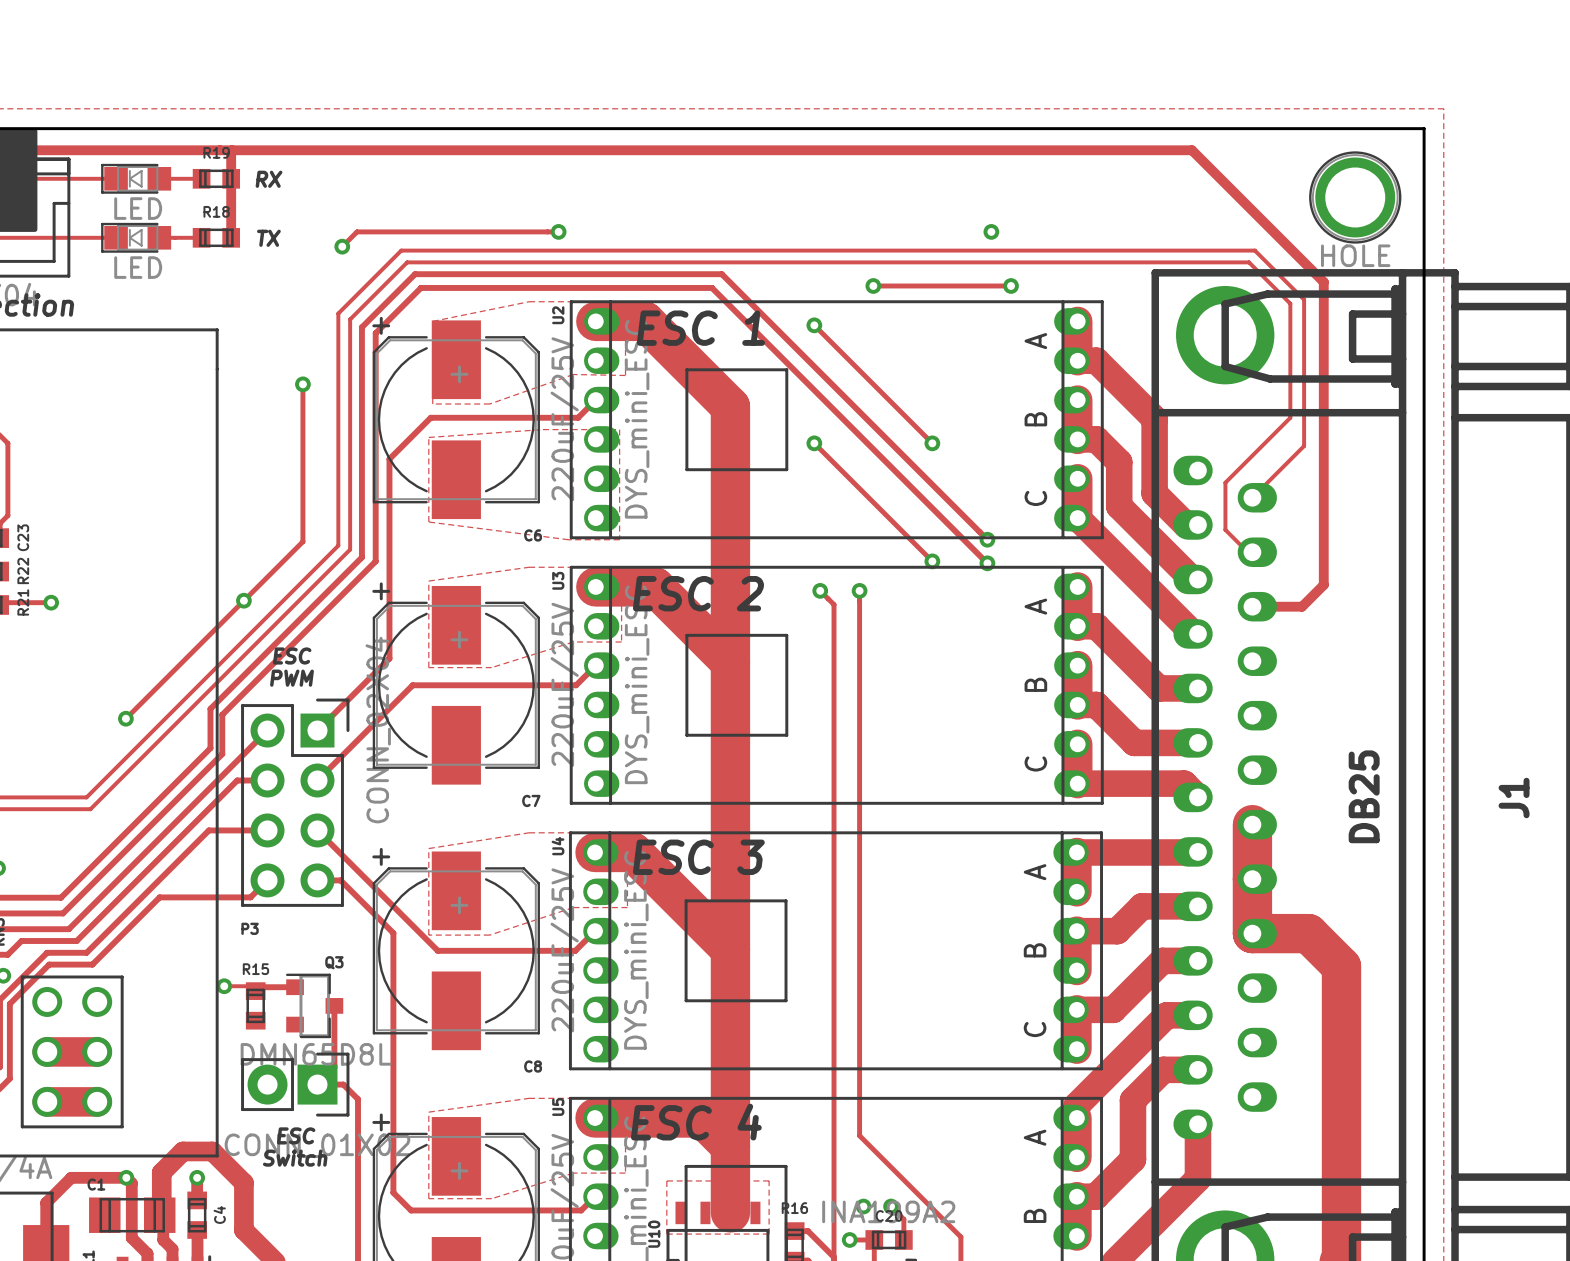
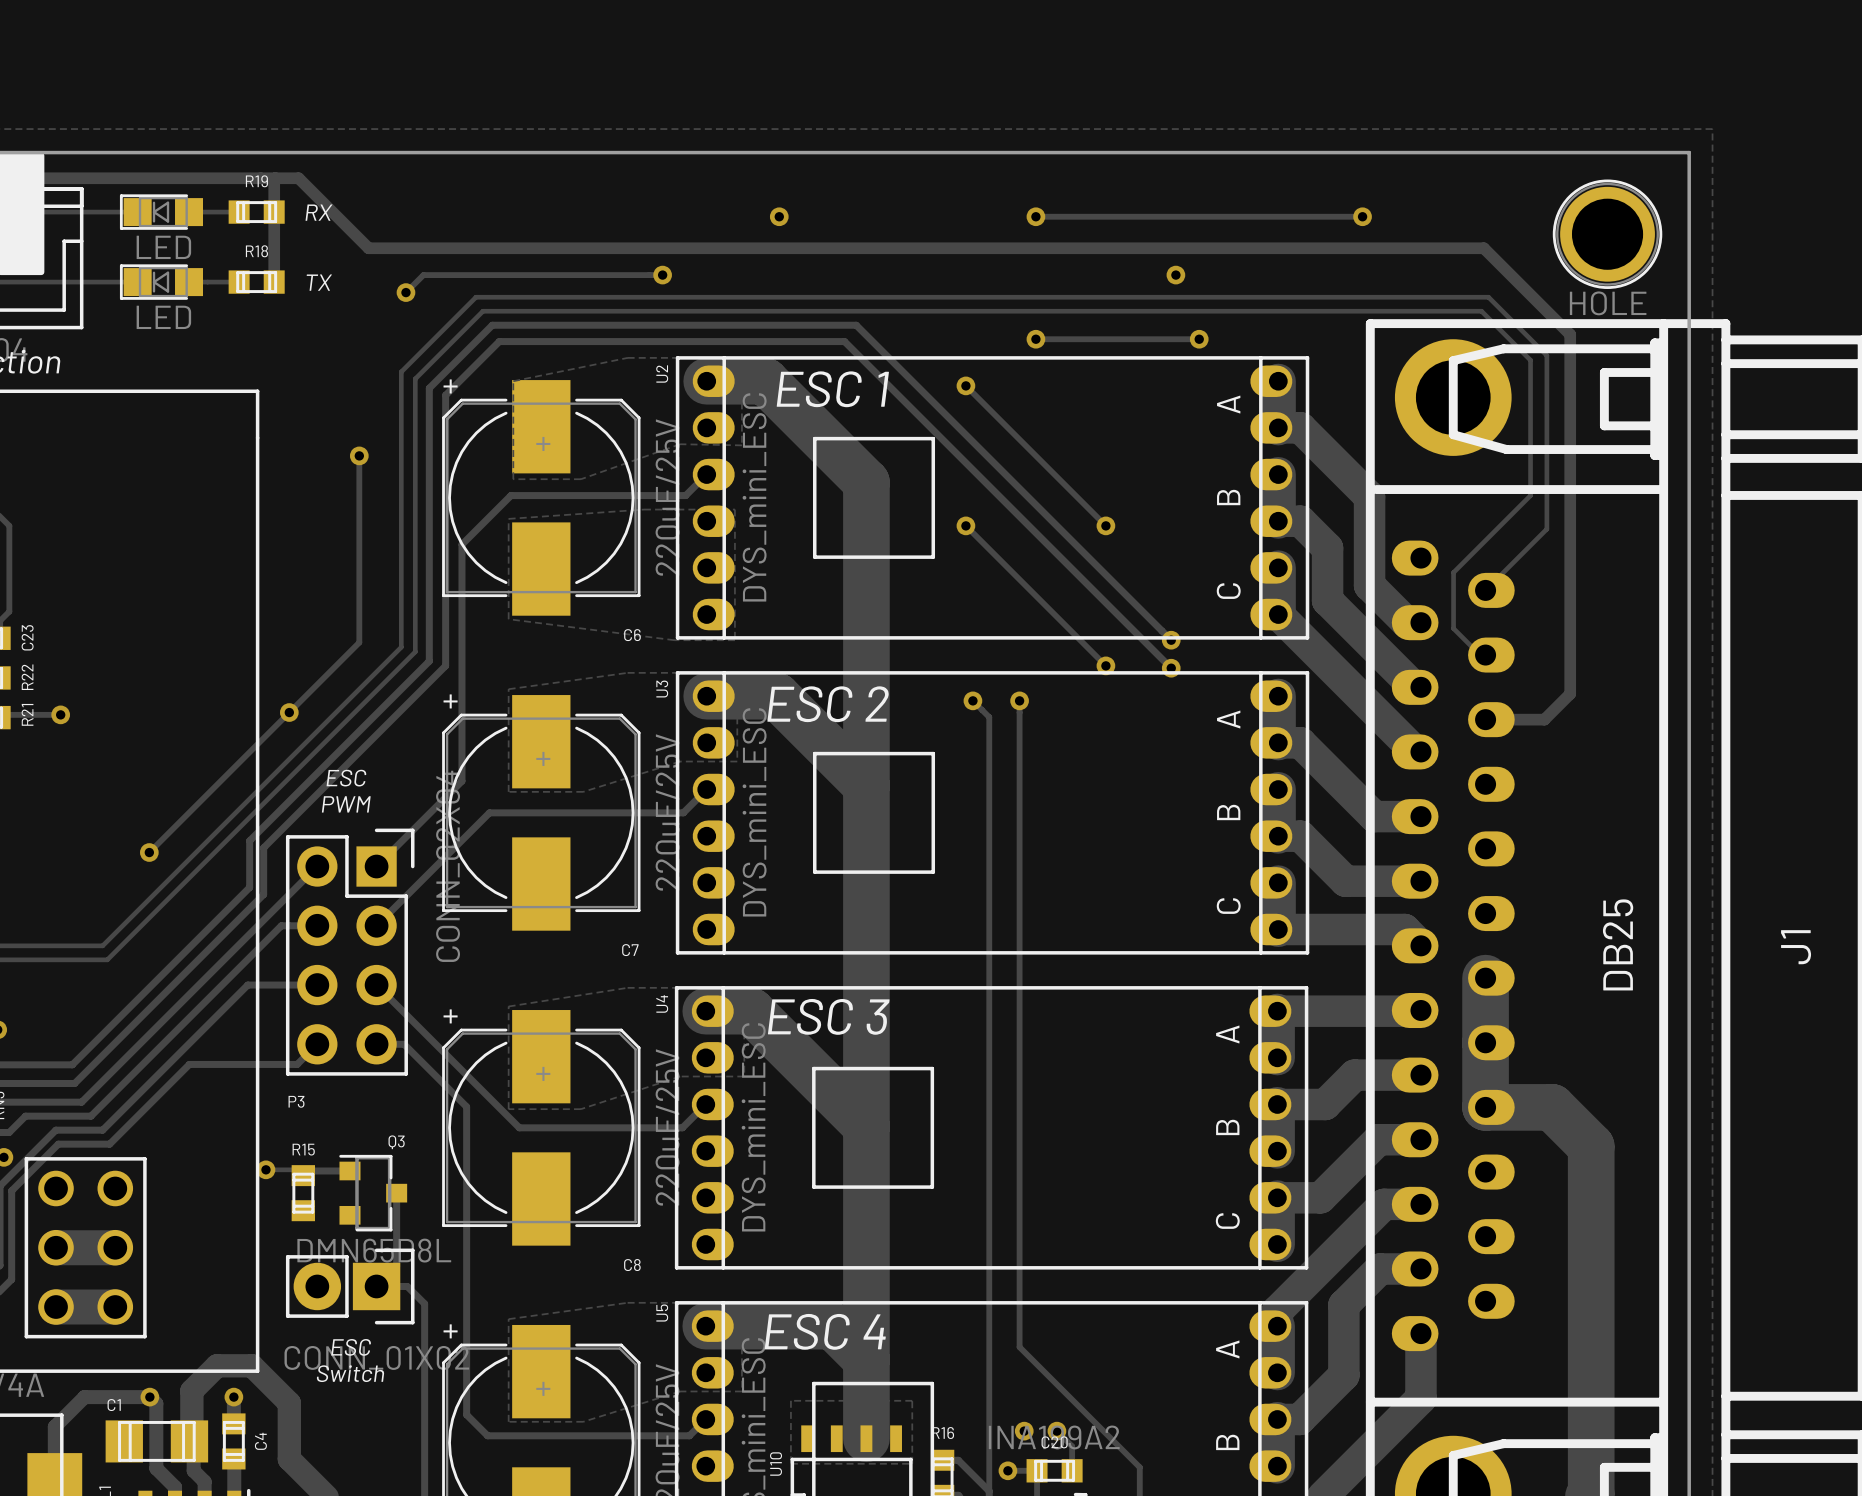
track: (251, 150) (1191, 150) (1251, 209) -> (298, 178) (368, 248) (1483, 248)
via: none -> (779, 216)
track: none -> (1035, 216) (1362, 216)
via: none -> (1035, 216)
via: none -> (1362, 216)

